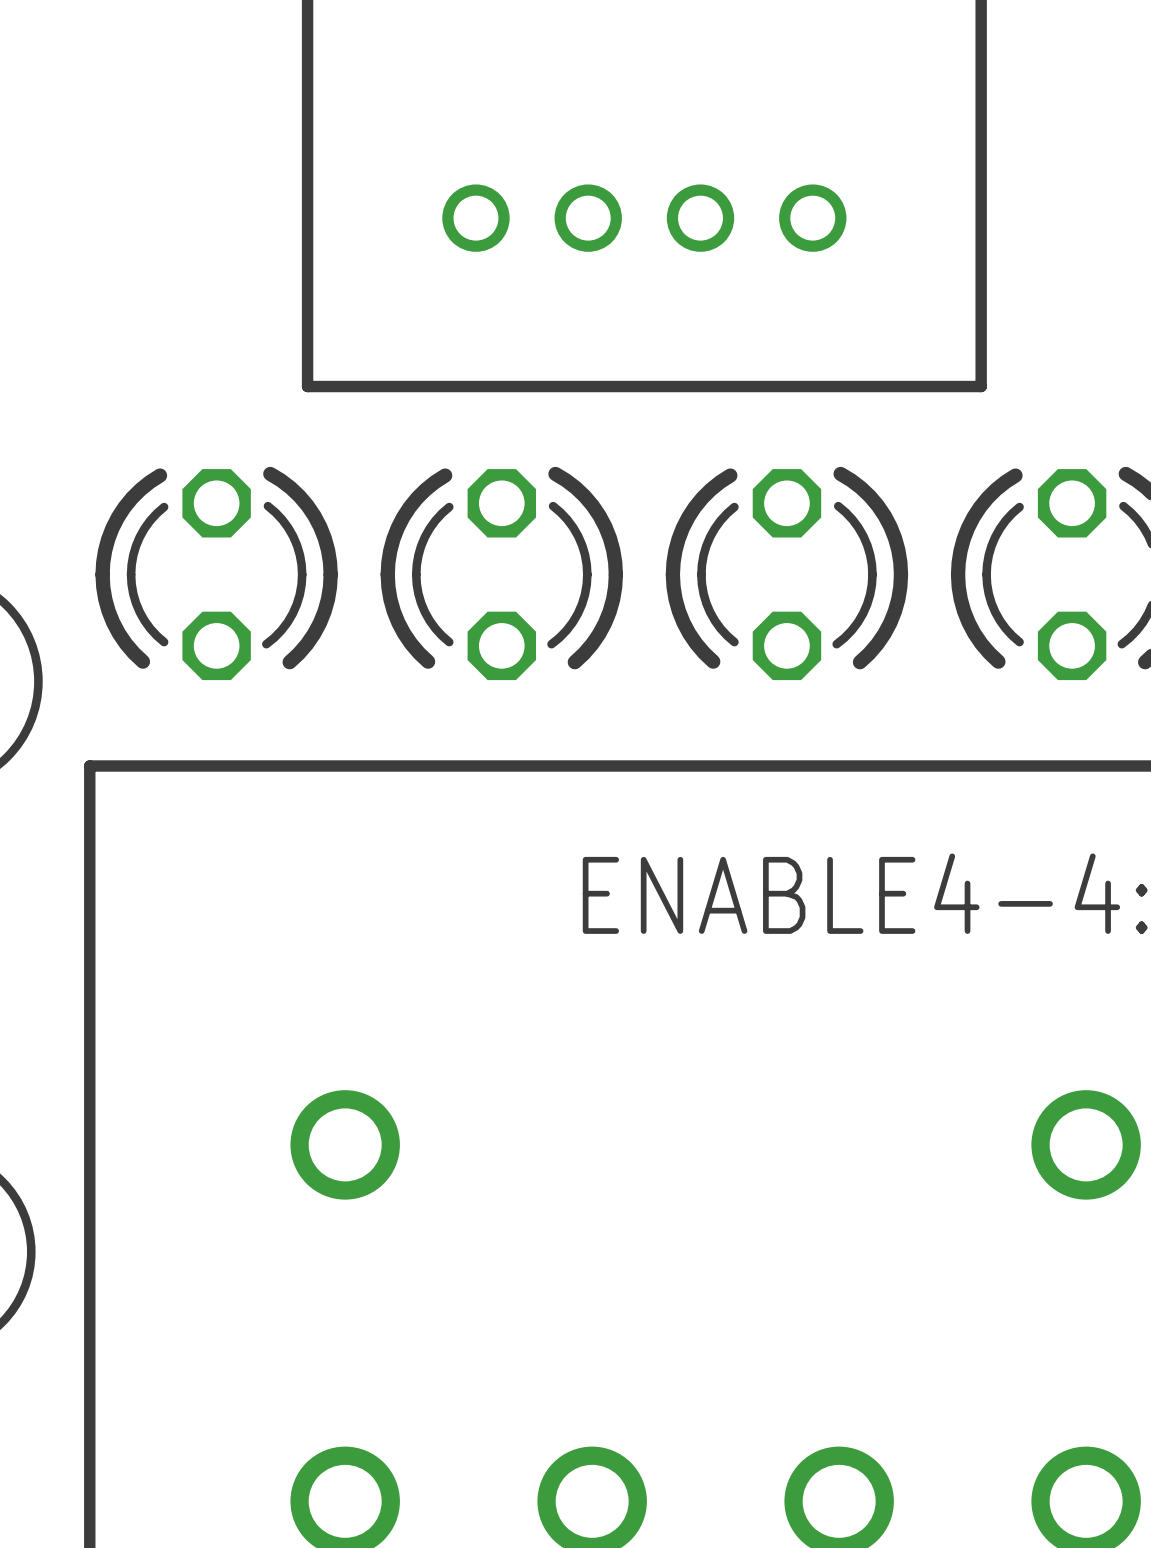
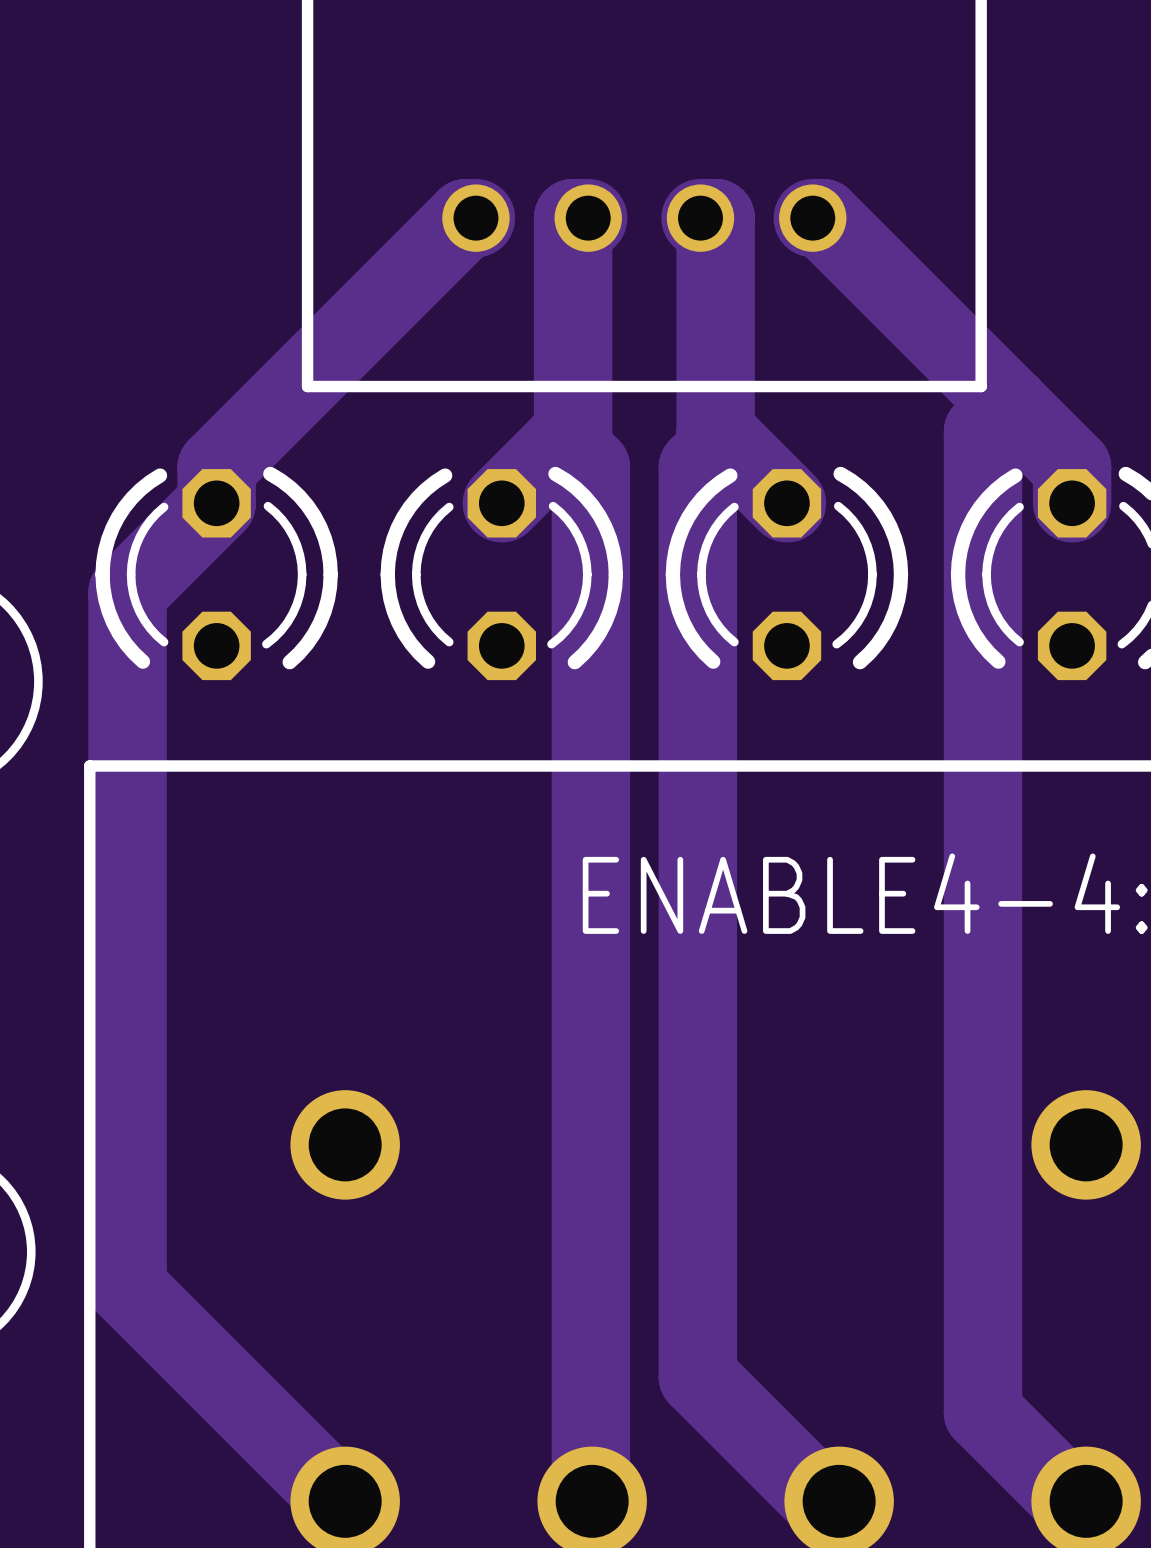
track: none -> (475, 218) (466, 218) (216, 467) (216, 503) (127, 592) (127, 1287) (341, 1501) (345, 1501)
track: none -> (588, 218) (573, 218) (573, 432) (501, 503)
track: none -> (700, 218) (715, 218) (715, 432) (786, 503)
track: none -> (812, 218) (822, 218) (1072, 467) (1072, 503)
track: none -> (1009, 405) (982, 432) (982, 1412) (1072, 1501) (1086, 1501)
track: none -> (564, 440) (590, 467) (592, 1501)
track: none -> (724, 440) (697, 467) (697, 1376) (822, 1501) (839, 1501)

